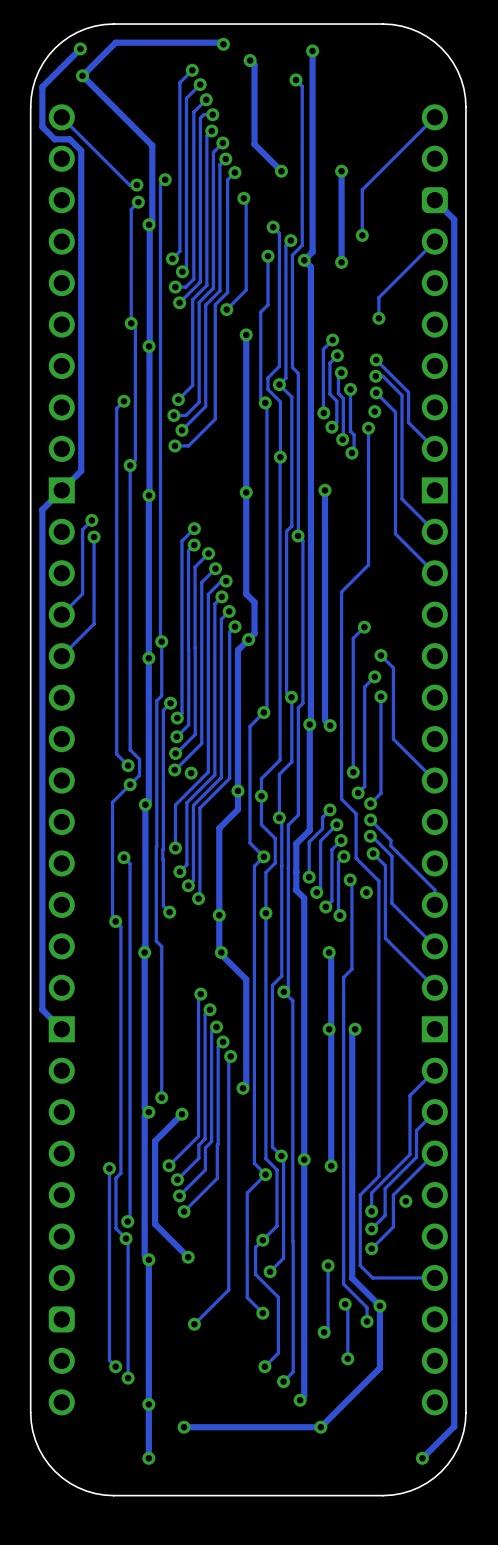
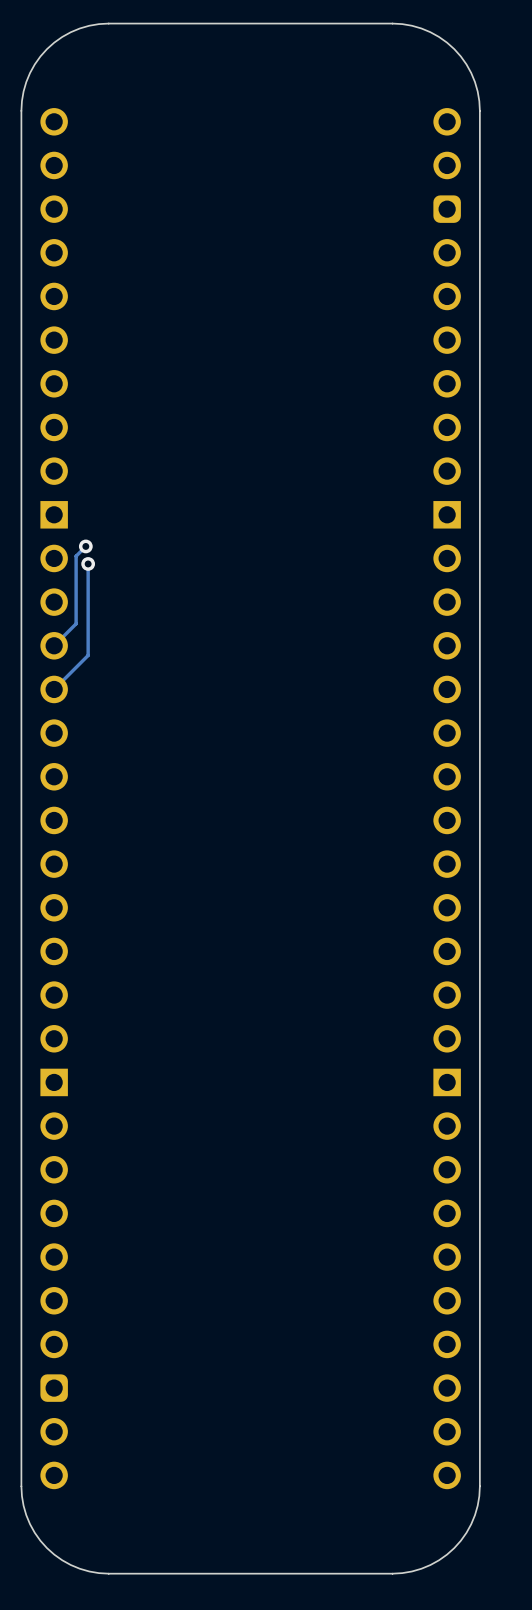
track: (223, 44) (221, 42) (115, 42) (82, 75) (152, 145) (152, 221) (149, 224) (148, 801) (145, 804) (144, 947) (144, 1108) (148, 1112) (144, 1116) (144, 1255) (148, 1259) (148, 1458) -> none
via: (223, 44) -> none
track: (80, 48) (42, 86) (42, 126) (54, 139) (69, 139) (81, 150) (81, 470) (42, 509) (42, 1009) (61, 1029) -> none
via: (80, 48) -> none
track: (312, 50) (312, 252) (304, 260) (310, 266) (309, 830) (296, 843) (296, 871) -> none
via: (312, 50) -> none
track: (250, 60) (254, 64) (254, 144) (281, 171) -> none
via: (250, 60) -> none
track: (192, 70) (179, 82) (179, 251) (172, 258) -> none
via: (192, 70) -> none
via: (82, 75) -> none
track: (295, 79) (302, 86) (302, 245) (292, 255) (292, 367) (298, 373) (298, 535) (302, 540) (302, 703) (298, 708) (298, 815) (288, 825) (288, 868) -> none
via: (295, 79) -> none
track: (200, 84) (186, 98) (186, 267) (182, 271) -> none
via: (200, 84) -> none
track: (206, 99) (193, 112) (193, 279) (185, 287) (175, 287) -> none
via: (206, 99) -> none
track: (212, 114) (203, 114) (200, 118) (200, 282) (179, 302) -> none
via: (212, 114) -> none
track: (61, 117) (129, 185) (136, 185) -> none
track: (434, 117) (362, 189) (362, 235) -> none
track: (211, 131) (206, 135) (206, 285) (192, 299) (192, 385) (178, 399) -> none
via: (211, 131) -> none
track: (222, 143) (213, 152) (213, 288) (199, 302) (199, 402) (186, 415) (173, 415) -> none
via: (222, 143) -> none
track: (225, 159) (219, 164) (219, 290) (205, 305) (205, 406) (181, 430) -> none
via: (225, 159) -> none
via: (281, 171) -> none
track: (341, 171) (341, 262) -> none
via: (341, 171) -> none
track: (234, 172) (227, 179) (227, 292) (215, 304) (215, 419) (188, 445) (174, 445) -> none
via: (234, 172) -> none
track: (165, 179) (160, 184) (161, 695) (156, 700) (156, 941) (161, 946) (161, 1097) -> none
via: (165, 179) -> none
via: (136, 185) -> none
track: (243, 198) (246, 200) (246, 290) (226, 309) -> none
via: (243, 198) -> none
track: (434, 200) (454, 219) (454, 1426) (422, 1458) -> none
track: (138, 202) (131, 209) (131, 323) (135, 327) (135, 460) (130, 465) (130, 749) (139, 759) (139, 775) (112, 802) (112, 918) (120, 926) (120, 1173) (115, 1178) (115, 1228) (128, 1240) (128, 1378) -> none
via: (138, 202) -> none
via: (149, 224) -> none
track: (273, 227) (279, 233) (279, 366) (267, 377) (267, 389) (280, 401) (280, 760) (261, 778) (261, 824) (275, 838) (275, 863) (265, 872) (265, 1158) (277, 1169) (277, 1225) (255, 1247) (255, 1274) (278, 1297) (278, 1353) (264, 1366) -> none
via: (273, 227) -> none
via: (362, 235) -> none
track: (290, 240) (285, 245) (285, 378) (279, 384) (291, 397) (291, 526) (286, 531) (286, 692) (291, 697) (291, 761) (279, 774) (281, 865) -> none
via: (290, 240) -> none
track: (434, 241) (378, 297) (378, 318) -> none
track: (267, 256) (267, 304) (260, 312) (260, 398) (266, 404) (266, 709) (250, 726) (250, 843) (263, 856) (254, 866) (254, 1163) (265, 1174) (247, 1192) (247, 1297) (262, 1313) -> none
via: (267, 256) -> none
via: (172, 258) -> none
via: (304, 260) -> none
via: (341, 262) -> none
via: (182, 271) -> none
via: (175, 287) -> none
via: (179, 302) -> none
via: (226, 309) -> none
via: (378, 318) -> none
via: (131, 323) -> none
track: (246, 334) (246, 594) (254, 602) (254, 633) (237, 650) (237, 809) (219, 828) (219, 952) (246, 979) (246, 1085) (242, 1088) -> none
via: (246, 334) -> none
track: (332, 340) (323, 349) (323, 413) -> none
via: (332, 340) -> none
via: (149, 346) -> none
track: (337, 355) (329, 363) (329, 394) (336, 401) (336, 422) (331, 427) -> none
via: (337, 355) -> none
track: (376, 359) (408, 392) (408, 422) (434, 448) -> none
via: (376, 359) -> none
track: (341, 372) (338, 375) (338, 393) (343, 398) (342, 439) -> none
via: (341, 372) -> none
track: (375, 376) (382, 376) (402, 395) (402, 498) (434, 531) -> none
via: (375, 376) -> none
via: (279, 384) -> none
track: (350, 389) (350, 431) (354, 434) (354, 450) (351, 453) -> none
via: (350, 389) -> none
track: (376, 392) (395, 412) (395, 533) (434, 573) -> none
via: (376, 392) -> none
via: (178, 399) -> none
track: (123, 401) (116, 408) (116, 754) (128, 765) -> none
via: (123, 401) -> none
via: (265, 402) -> none
via: (374, 411) -> none
via: (323, 413) -> none
via: (173, 415) -> none
via: (331, 427) -> none
track: (368, 428) (368, 564) (341, 591) (341, 799) (356, 813) (356, 858) (378, 881) (378, 1176) (360, 1195) (360, 1265) (372, 1277) (434, 1277) -> none
via: (368, 428) -> none
via: (181, 430) -> none
via: (342, 439) -> none
via: (174, 445) -> none
via: (351, 453) -> none
via: (280, 457) -> none
via: (130, 465) -> none
track: (325, 490) (325, 720) (330, 725) -> none
via: (325, 490) -> none
via: (246, 492) -> none
via: (149, 495) -> none
track: (194, 528) (181, 541) (181, 713) (177, 718) -> none
via: (194, 528) -> none
via: (298, 535) -> none
track: (194, 545) (188, 550) (188, 650) -> none
via: (194, 545) -> none
track: (208, 553) (195, 567) (195, 647) -> none
via: (208, 553) -> none
track: (215, 568) (201, 582) (201, 743) (174, 769) -> none
via: (215, 568) -> none
track: (226, 581) (221, 581) (208, 594) (208, 772) (175, 804) (175, 848) -> none
via: (226, 581) -> none
track: (221, 596) (214, 603) (214, 774) (186, 802) (186, 864) (179, 871) -> none
via: (221, 596) -> none
track: (229, 611) (221, 619) (221, 777) (193, 805) (193, 880) (188, 885) -> none
via: (229, 611) -> none
track: (235, 626) (229, 632) (229, 778) (199, 808) (198, 898) -> none
via: (235, 626) -> none
track: (364, 627) (353, 638) (353, 772) -> none
via: (364, 627) -> none
via: (248, 639) -> none
via: (161, 641) -> none
track: (195, 647) (195, 734) (175, 753) -> none
track: (188, 650) (188, 724) (176, 736) -> none
track: (380, 655) (393, 667) (393, 739) (434, 780) -> none
via: (380, 655) -> none
via: (148, 658) -> none
track: (374, 676) (364, 686) (364, 786) (358, 792) -> none
via: (374, 676) -> none
track: (380, 696) (380, 793) (370, 803) -> none
via: (380, 696) -> none
via: (291, 697) -> none
track: (170, 703) (163, 710) (163, 905) (169, 912) -> none
via: (170, 703) -> none
via: (263, 712) -> none
via: (177, 718) -> none
via: (309, 724) -> none
via: (330, 725) -> none
via: (176, 736) -> none
via: (175, 753) -> none
via: (128, 765) -> none
via: (174, 769) -> none
via: (353, 772) -> none
via: (191, 773) -> none
via: (130, 784) -> none
via: (237, 790) -> none
via: (358, 792) -> none
via: (261, 796) -> none
via: (370, 803) -> none
via: (145, 804) -> none
track: (329, 809) (322, 817) (322, 828) (309, 842) (309, 877) -> none
via: (329, 809) -> none
via: (279, 817) -> none
track: (370, 819) (390, 840) (390, 846) (434, 889) (434, 904) -> none
via: (370, 819) -> none
track: (336, 824) (320, 840) (320, 888) (316, 892) -> none
via: (336, 824) -> none
track: (370, 836) (391, 856) (391, 903) (434, 946) -> none
via: (370, 836) -> none
track: (341, 840) (331, 849) (331, 900) (325, 906) -> none
via: (341, 840) -> none
via: (175, 848) -> none
track: (373, 853) (385, 865) (385, 938) (434, 987) -> none
via: (373, 853) -> none
via: (263, 856) -> none
track: (343, 856) (338, 862) (339, 915) -> none
via: (343, 856) -> none
track: (123, 857) (130, 863) (130, 1219) (127, 1221) -> none
via: (123, 857) -> none
track: (281, 865) (281, 976) (272, 985) (272, 1147) (283, 1158) (283, 1258) (270, 1271) -> none
track: (288, 868) (288, 987) (283, 991) (292, 1000) (293, 1371) (283, 1381) -> none
via: (179, 871) -> none
track: (296, 871) (296, 890) (304, 898) (304, 1396) (300, 1400) -> none
via: (309, 877) -> none
track: (350, 879) (351, 881) (351, 969) (343, 977) (343, 1284) (367, 1307) (367, 1321) -> none
via: (350, 879) -> none
via: (188, 885) -> none
via: (316, 892) -> none
via: (366, 892) -> none
via: (198, 898) -> none
via: (325, 906) -> none
via: (169, 912) -> none
via: (265, 913) -> none
via: (219, 915) -> none
via: (339, 915) -> none
via: (115, 921) -> none
via: (144, 952) -> none
via: (221, 952) -> none
track: (329, 952) (331, 954) (331, 1027) (329, 1029) (331, 1031) (331, 1166) -> none
via: (329, 952) -> none
via: (283, 991) -> none
track: (200, 994) (198, 996) (198, 1136) (169, 1165) -> none
via: (200, 994) -> none
track: (210, 1009) (205, 1014) (205, 1138) (198, 1145) (198, 1158) (177, 1179) -> none
via: (210, 1009) -> none
track: (216, 1027) (211, 1031) (211, 1141) (205, 1147) (205, 1170) (179, 1195) -> none
via: (216, 1027) -> none
via: (329, 1029) -> none
track: (355, 1029) (352, 1032) (352, 1278) (379, 1305) (379, 1368) (320, 1427) (184, 1427) -> none
via: (355, 1029) -> none
track: (223, 1042) (218, 1046) (217, 1178) (184, 1211) -> none
via: (223, 1042) -> none
track: (230, 1056) (228, 1058) (228, 1289) (194, 1324) -> none
via: (230, 1056) -> none
track: (434, 1070) (409, 1095) (409, 1154) (371, 1192) (371, 1211) -> none
via: (242, 1088) -> none
via: (161, 1097) -> none
via: (148, 1112) -> none
track: (434, 1112) (416, 1130) (416, 1157) (385, 1188) (385, 1215) (371, 1228) -> none
track: (181, 1114) (155, 1141) (155, 1224) (188, 1257) -> none
via: (181, 1114) -> none
track: (434, 1153) (393, 1195) (393, 1227) (371, 1248) -> none
via: (281, 1156) -> none
via: (304, 1159) -> none
via: (169, 1165) -> none
via: (331, 1166) -> none
track: (109, 1168) (109, 1360) (115, 1366) -> none
via: (109, 1168) -> none
via: (265, 1174) -> none
via: (177, 1179) -> none
via: (179, 1195) -> none
via: (405, 1201) -> none
via: (184, 1211) -> none
via: (371, 1211) -> none
via: (127, 1221) -> none
via: (371, 1228) -> none
via: (126, 1238) -> none
via: (262, 1240) -> none
via: (371, 1248) -> none
via: (188, 1257) -> none
via: (148, 1259) -> none
track: (328, 1265) (328, 1328) (324, 1332) -> none
via: (328, 1265) -> none
via: (270, 1271) -> none
track: (345, 1304) (347, 1306) (347, 1358) -> none
via: (345, 1304) -> none
via: (379, 1305) -> none
via: (262, 1313) -> none
via: (367, 1321) -> none
via: (194, 1324) -> none
via: (324, 1332) -> none
via: (347, 1358) -> none
via: (115, 1366) -> none
via: (264, 1366) -> none
via: (128, 1378) -> none
via: (283, 1381) -> none
via: (300, 1400) -> none
via: (148, 1404) -> none
via: (184, 1427) -> none
via: (320, 1427) -> none
via: (148, 1458) -> none
via: (422, 1458) -> none

